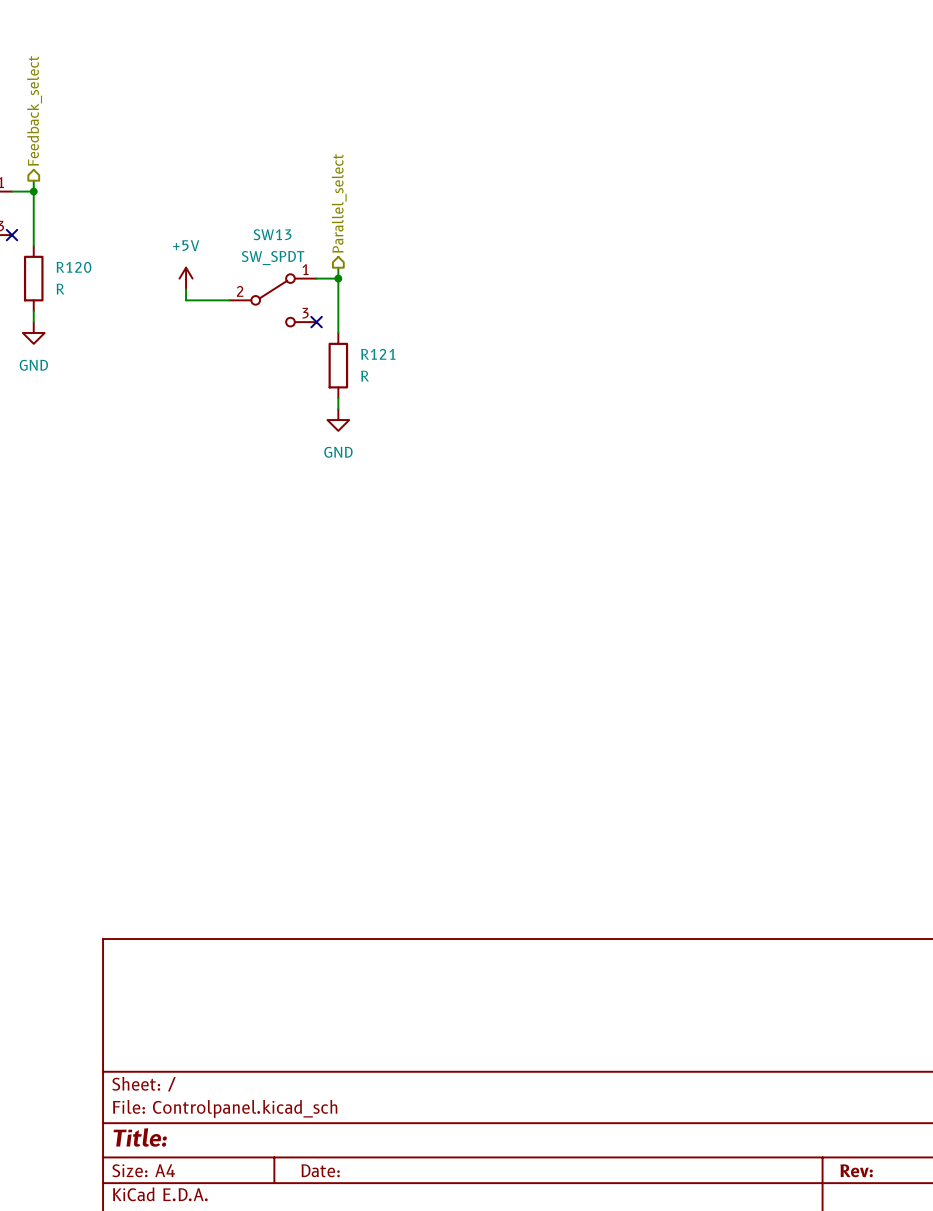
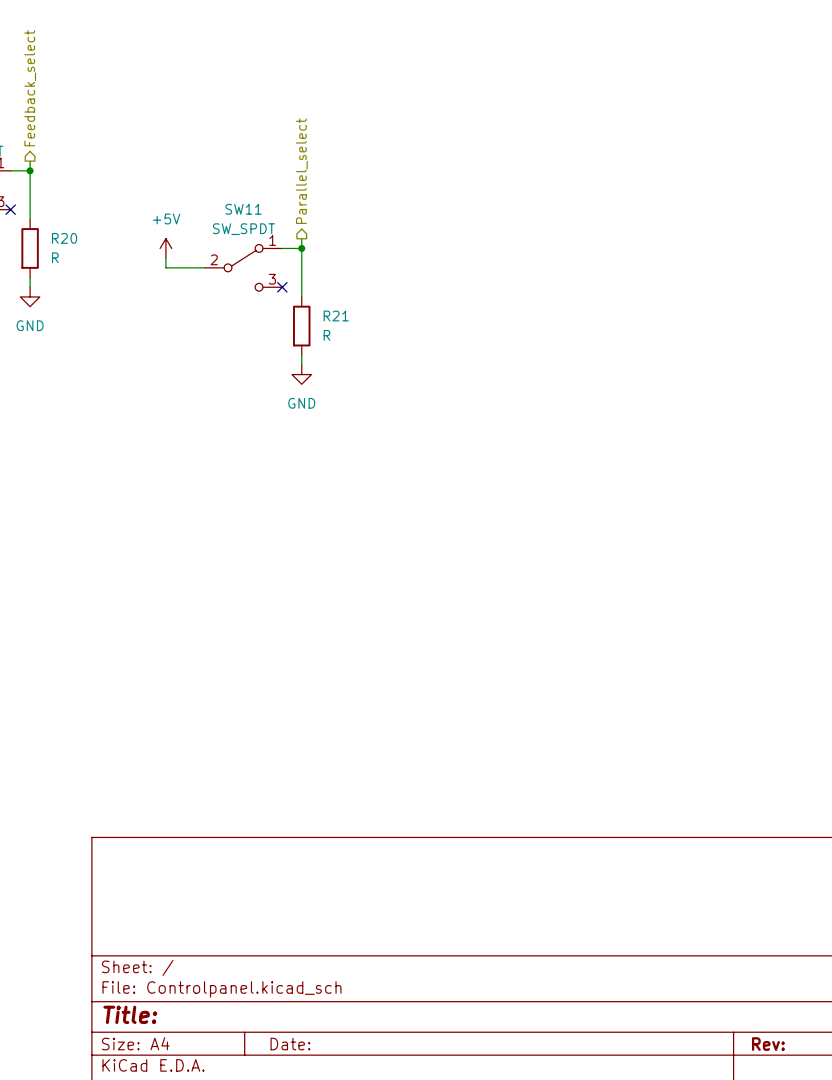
SW13 name: SW13 (272, 234) -> SW11 (243, 209)
R120 name: R120 (73, 267) -> R20 (64, 238)
R121 name: R121 (378, 354) -> R21 (336, 316)

